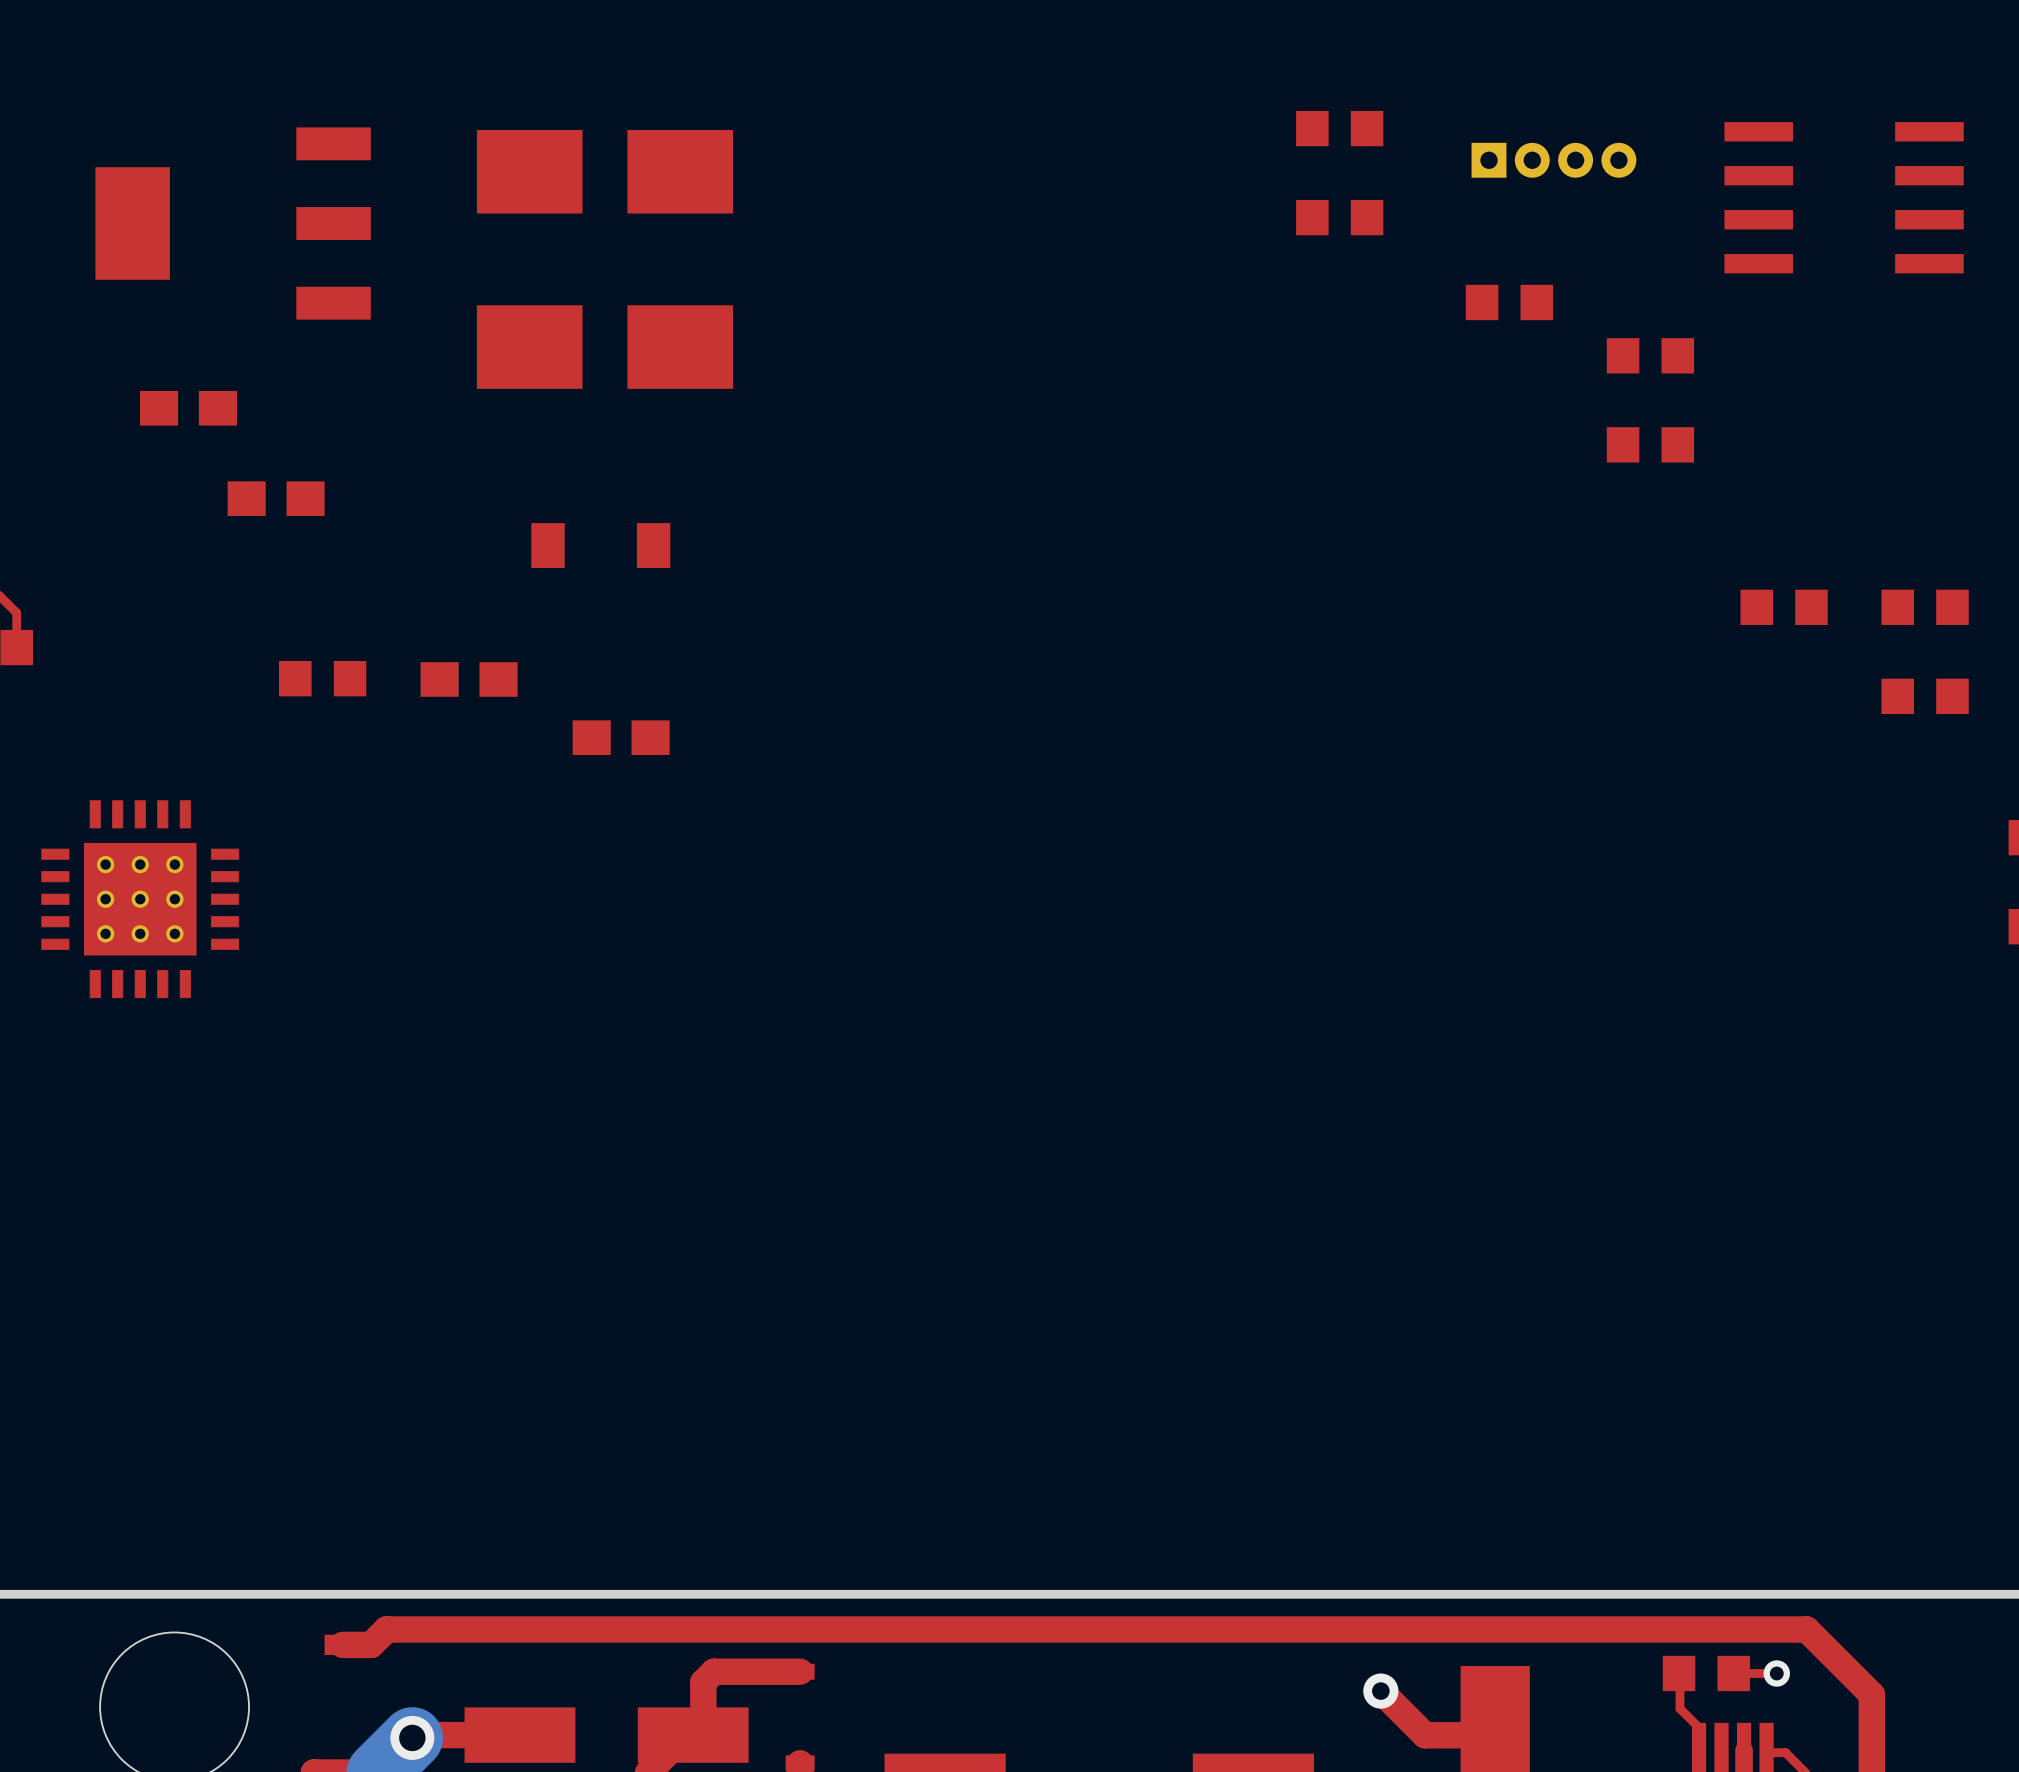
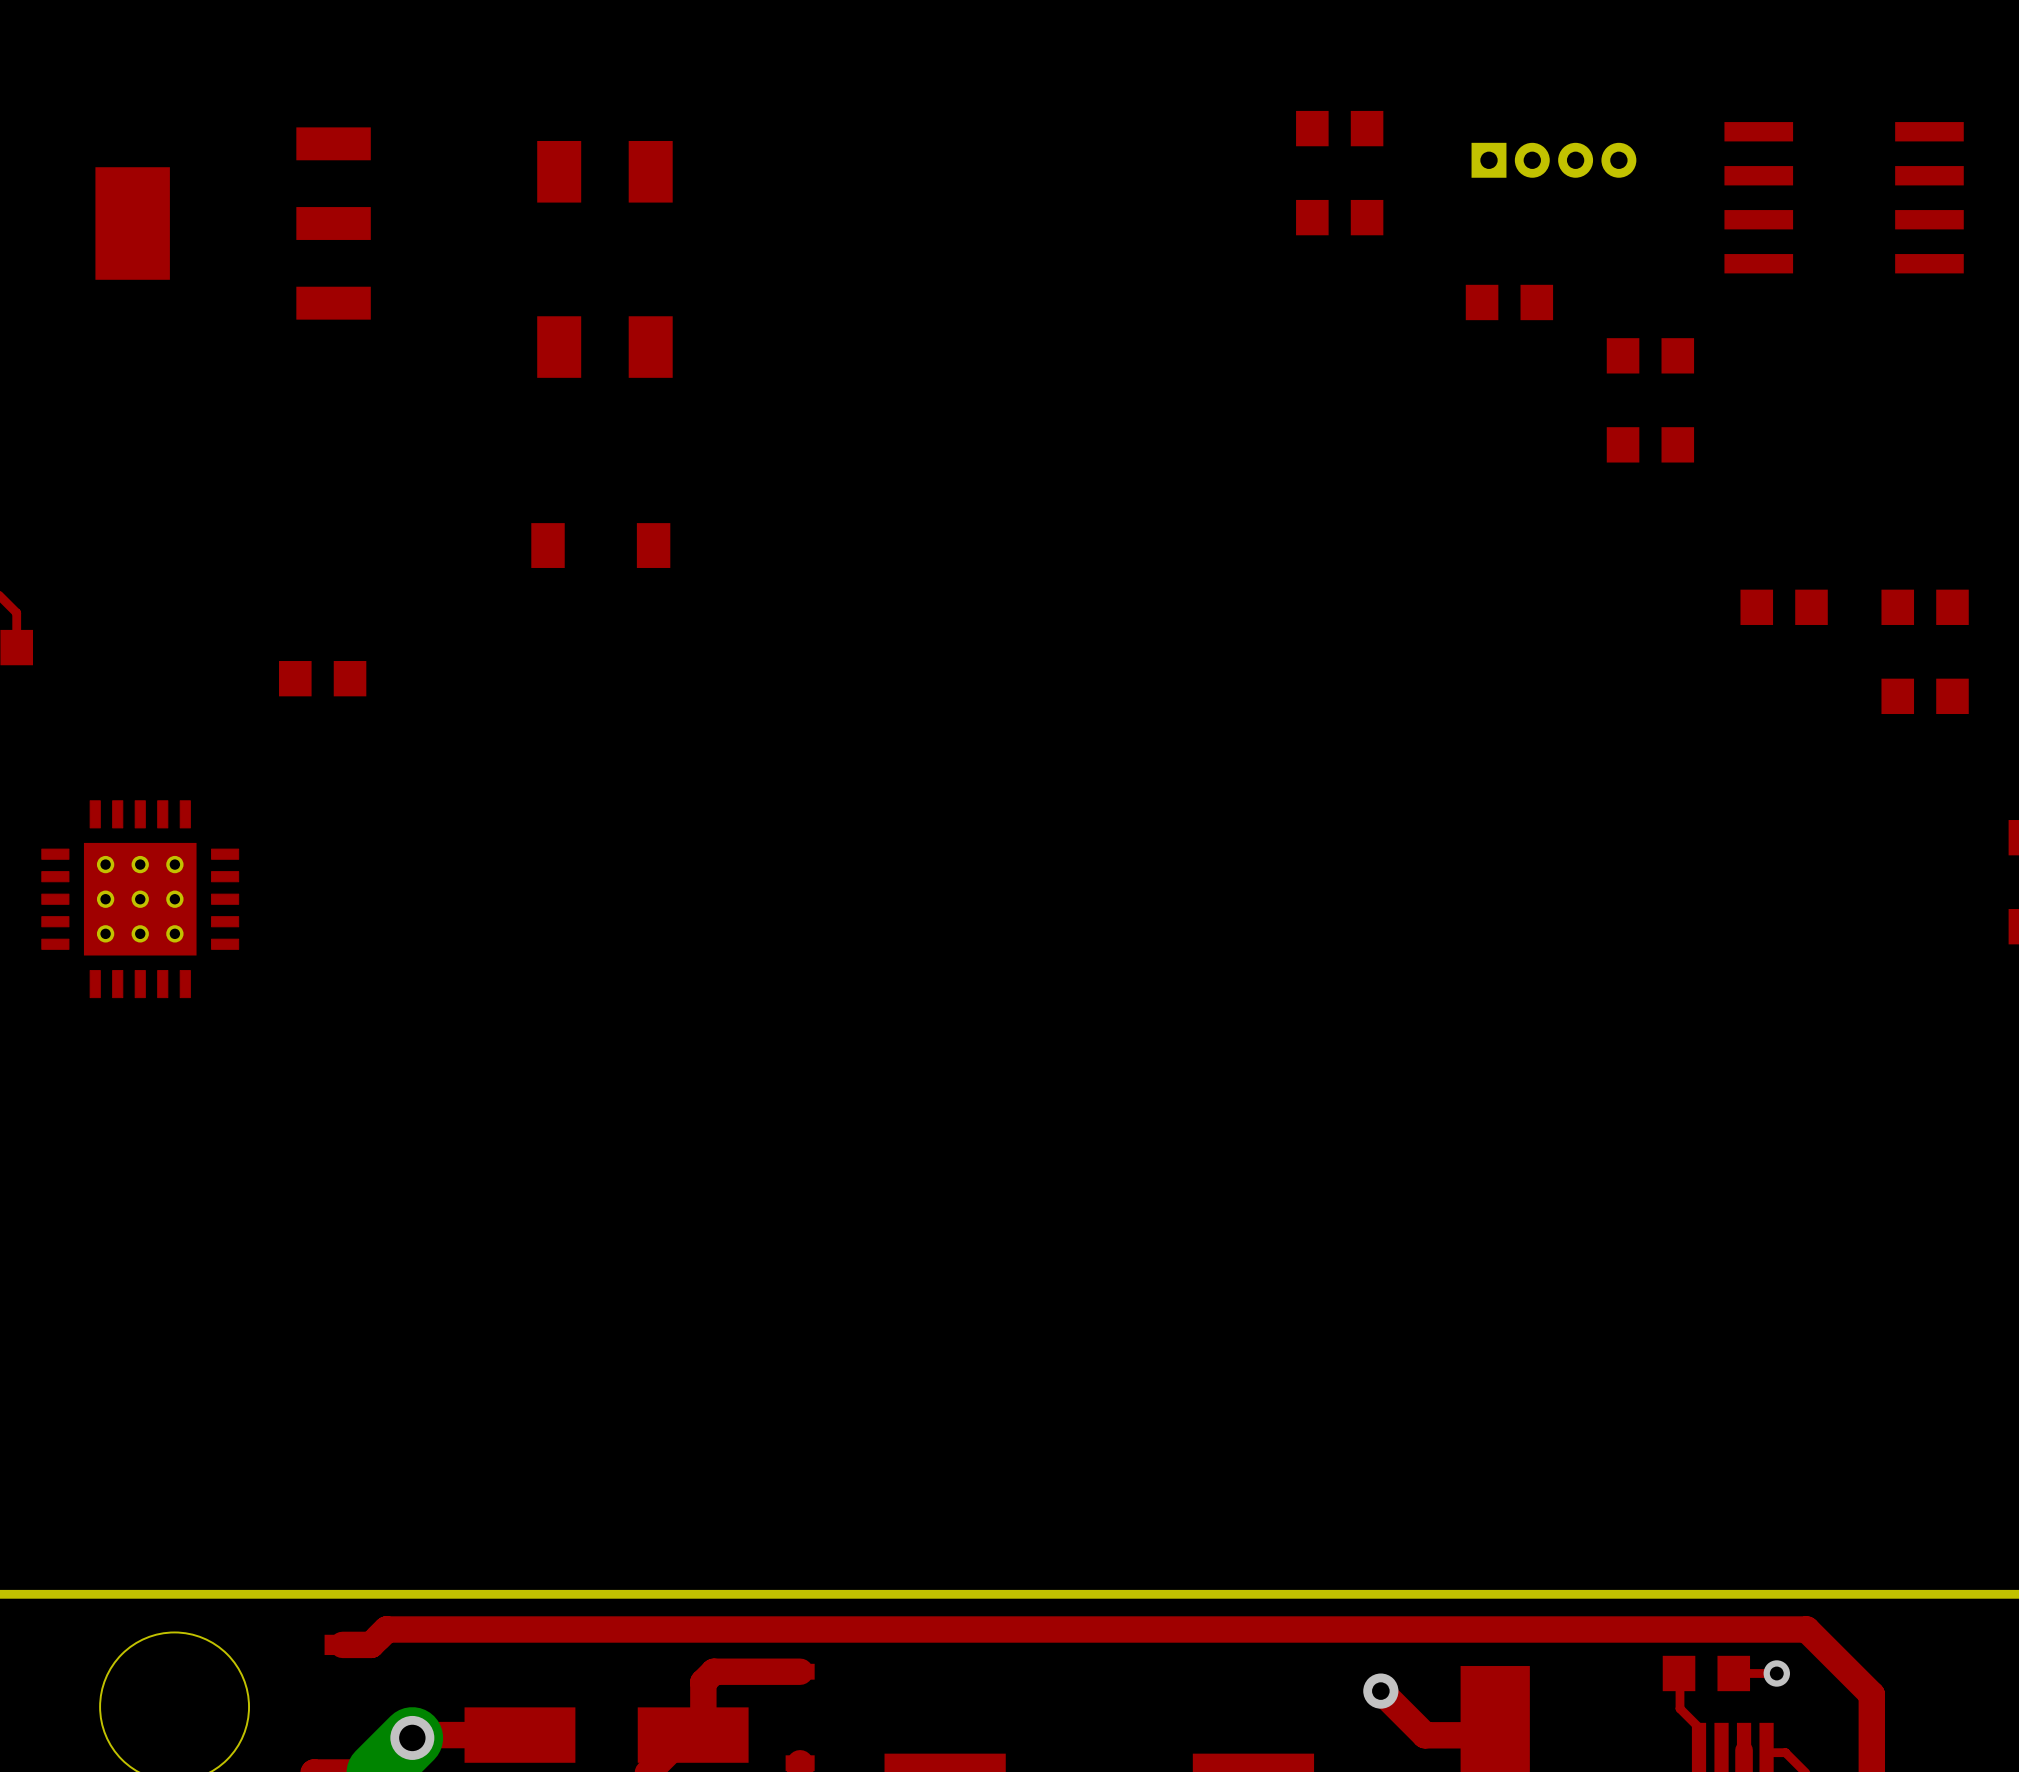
part footprint: [476, 129, 733, 214] -> [537, 140, 673, 203]
part footprint: [476, 305, 733, 389] -> [537, 316, 673, 378]
part: (188, 408) -> none
part: (276, 498) -> none
part: (469, 679) -> none
part: (621, 737) -> none

